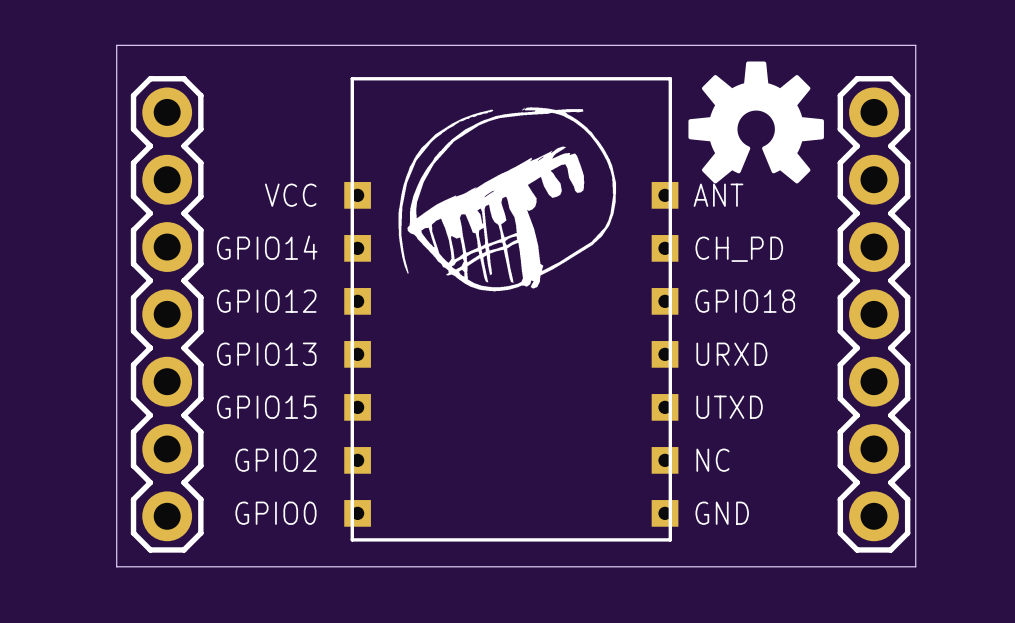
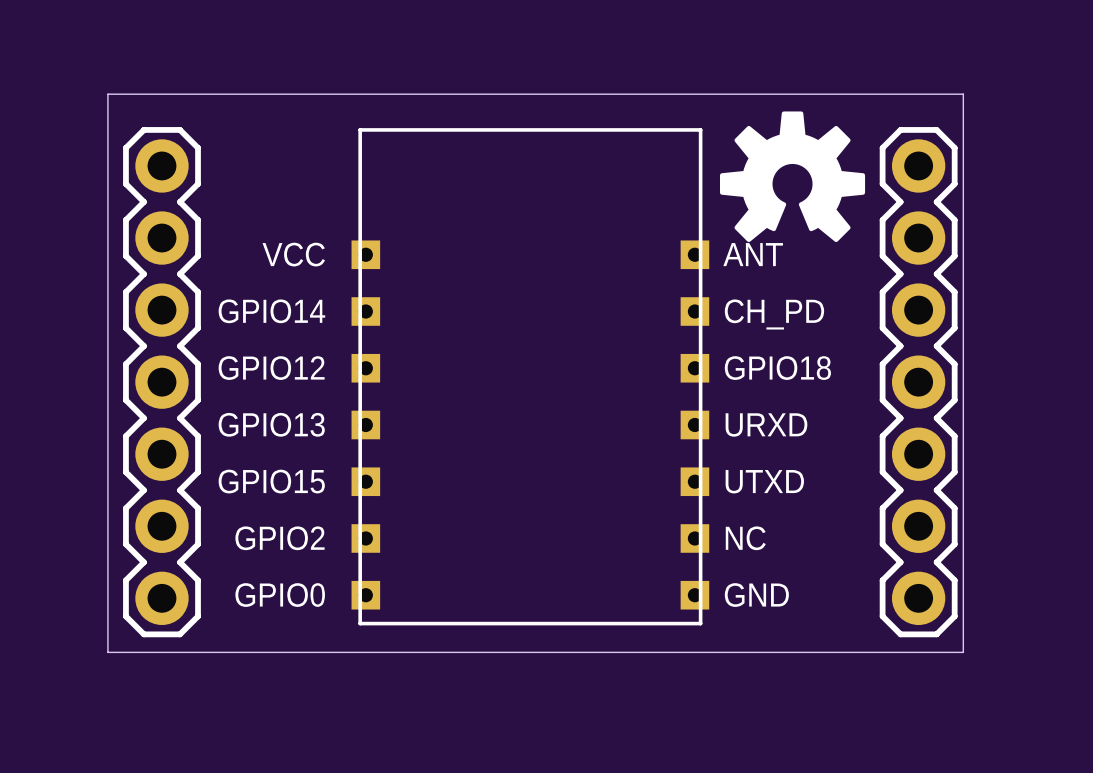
drawing: [398, 107, 617, 292] -> none

